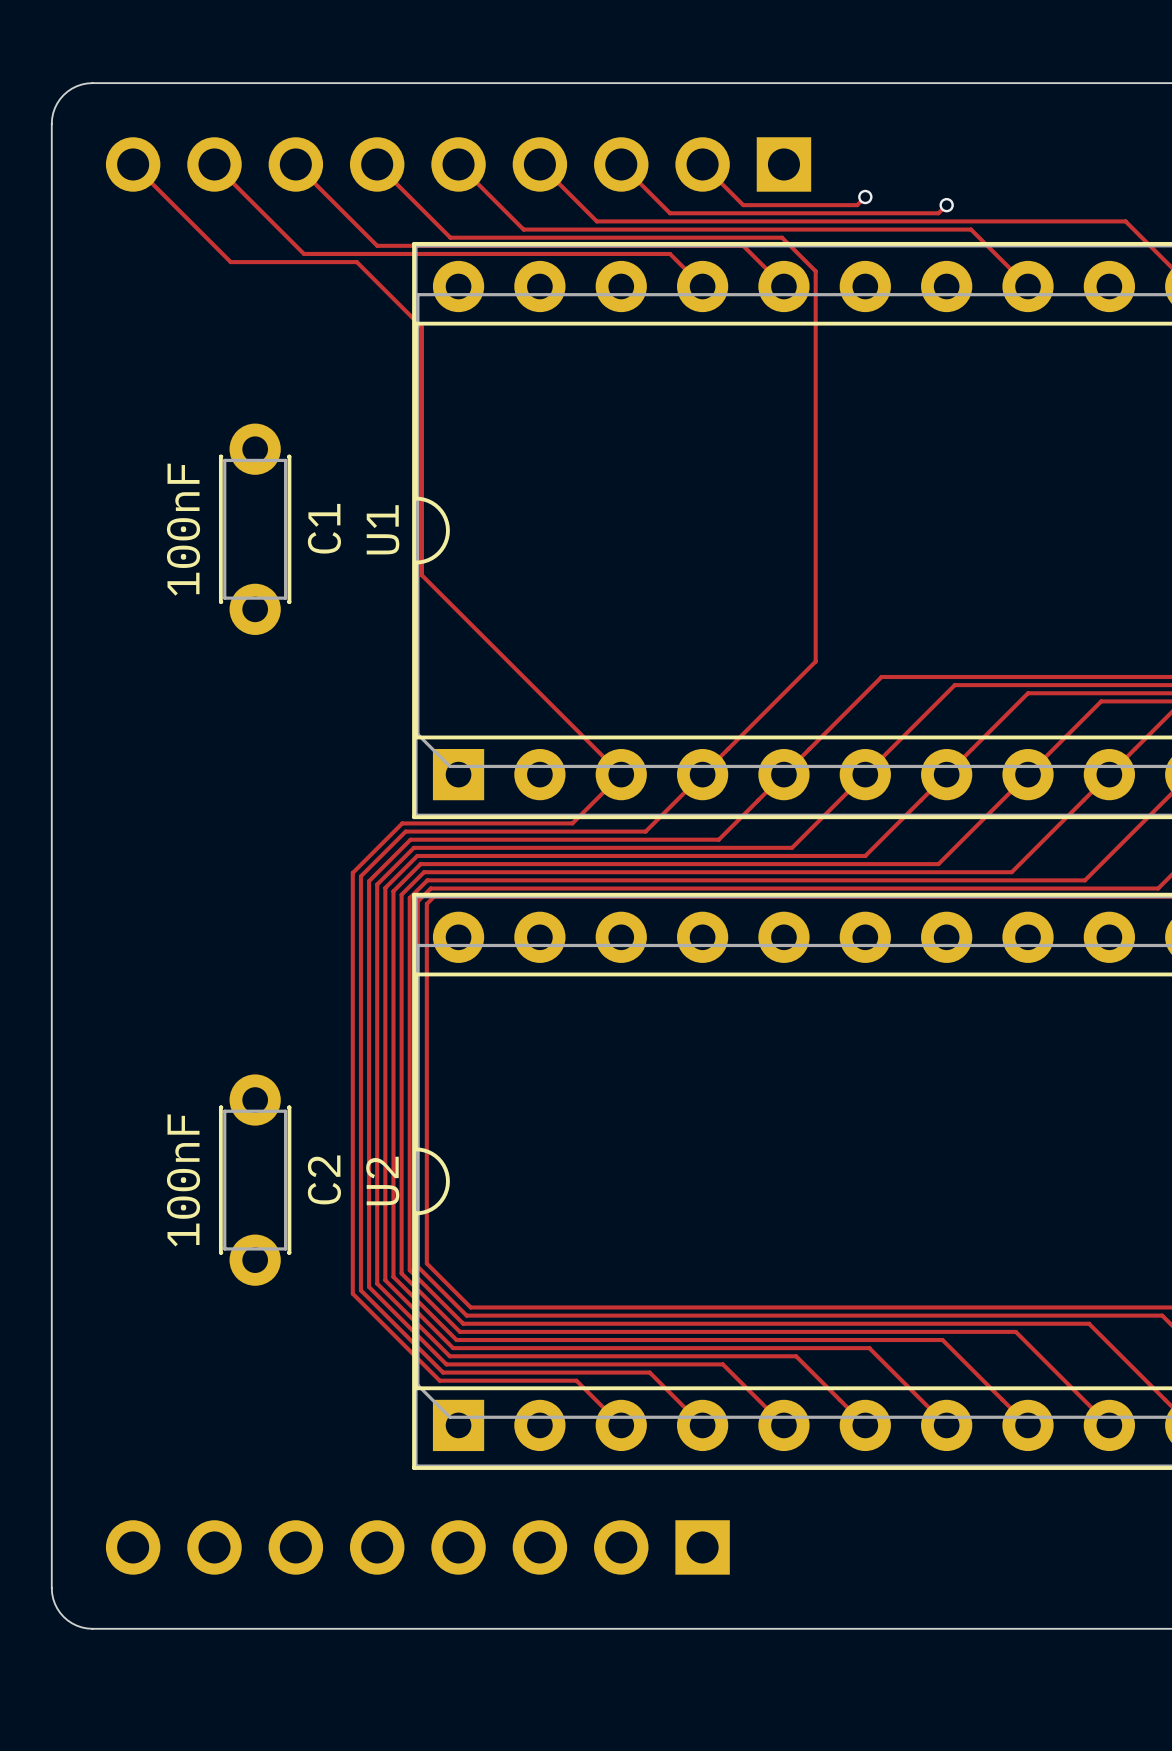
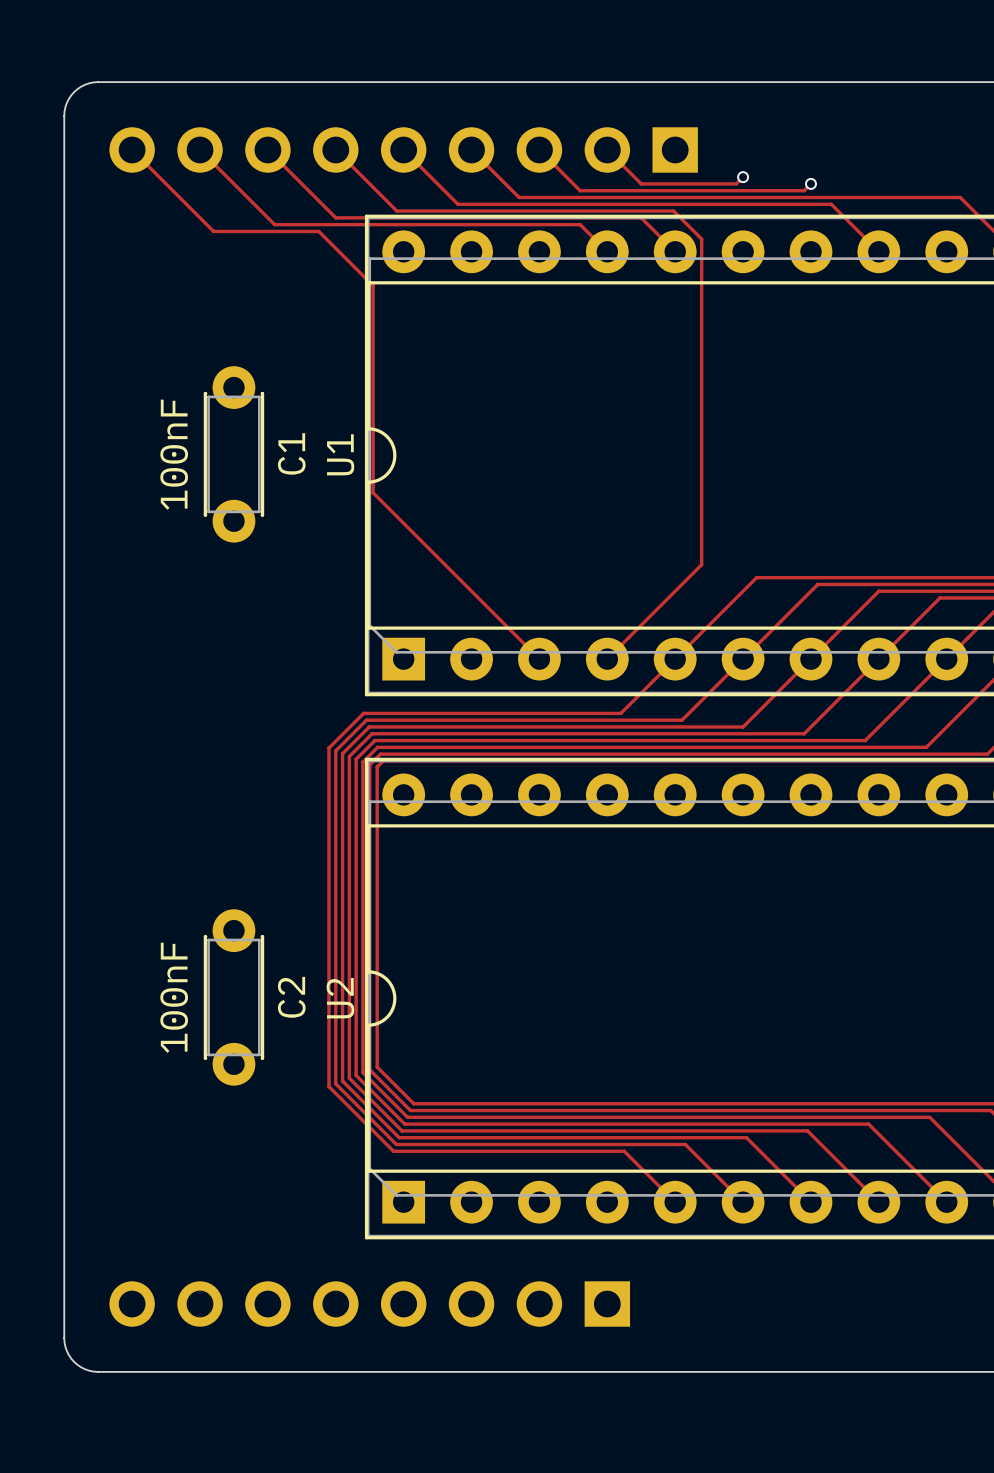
track: (621, 774) (572, 823) (402, 823) (352, 872) (352, 1293) (439, 1380) (576, 1380) (621, 1425) -> none
track: (702, 774) (645, 831) (405, 831) (360, 876) (360, 1290) (443, 1372) (649, 1372) (702, 1425) -> none

